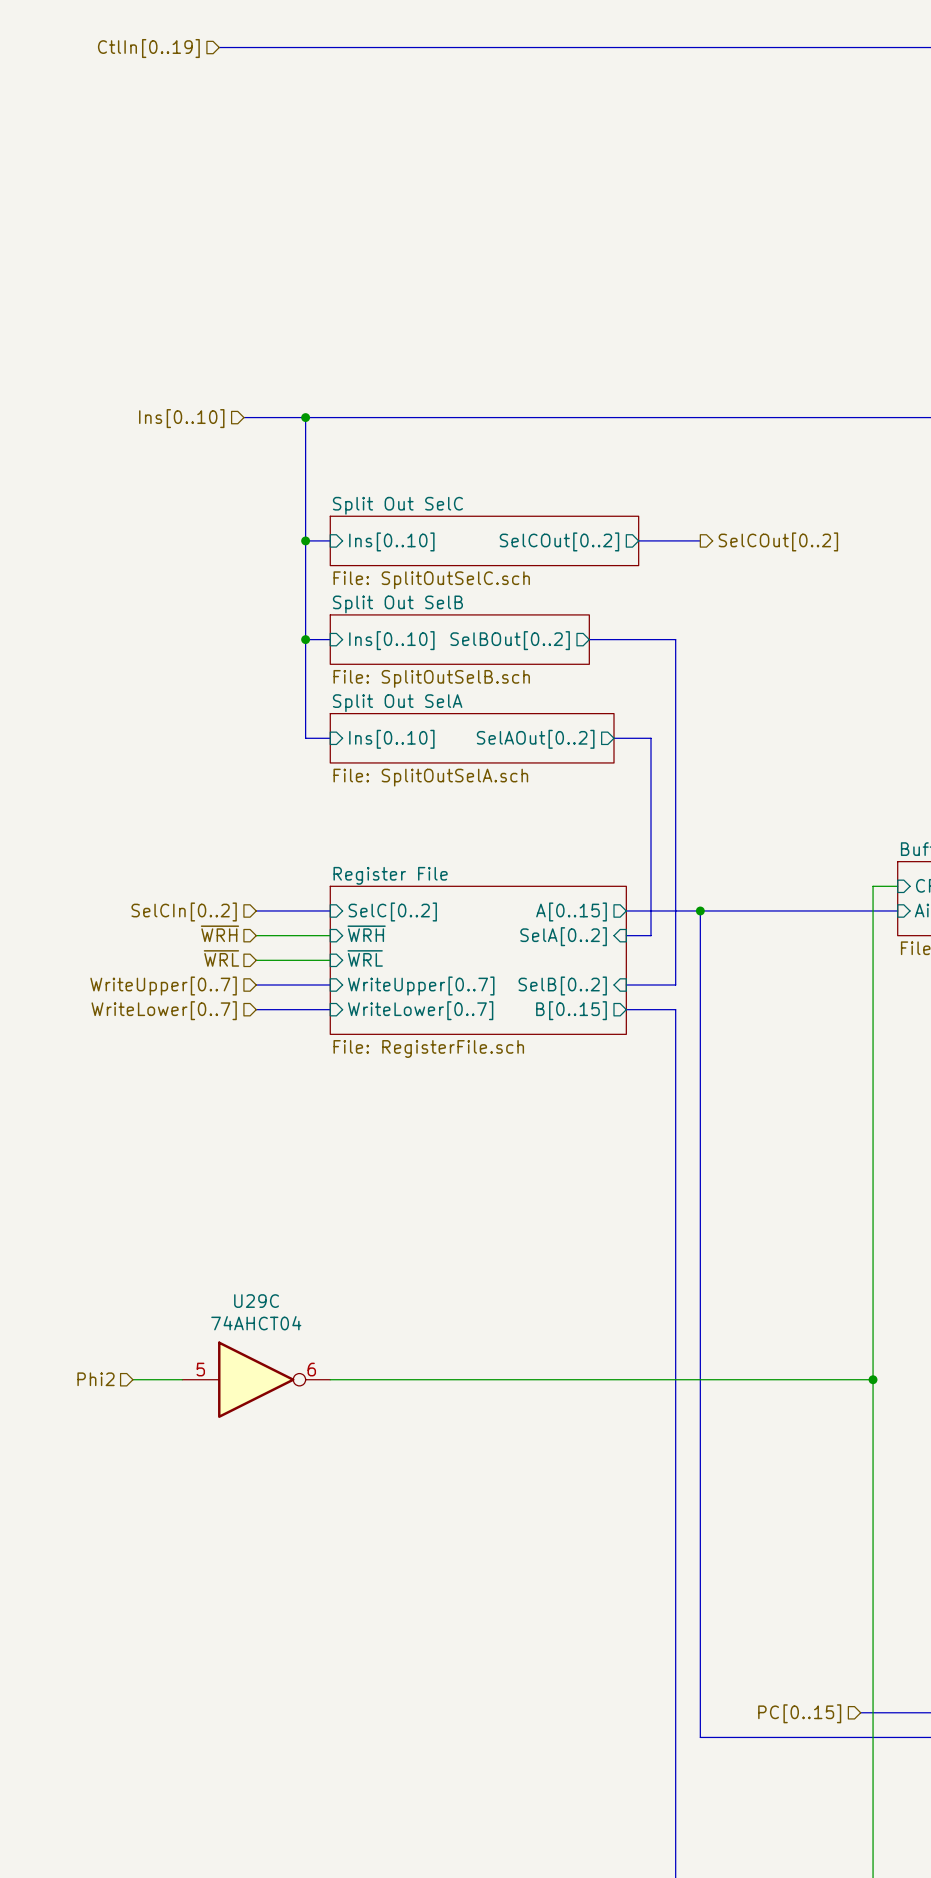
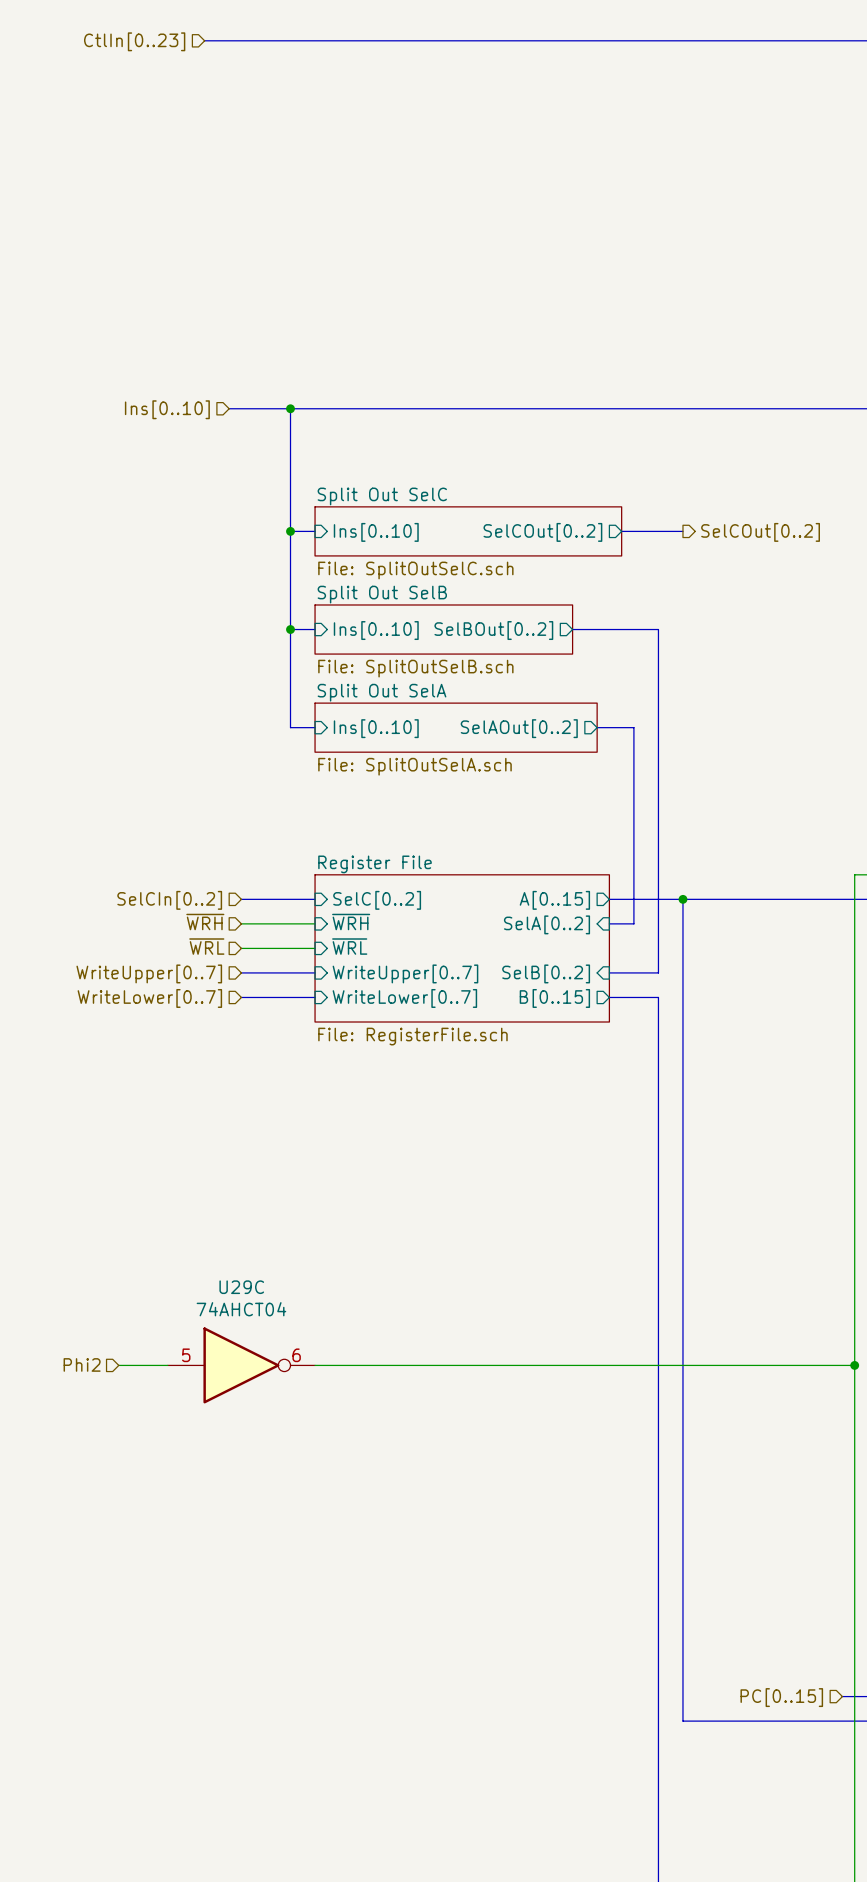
hierarchical label: CtlIn[0..19] (148, 48) -> CtlIn[0..23] (134, 41)

